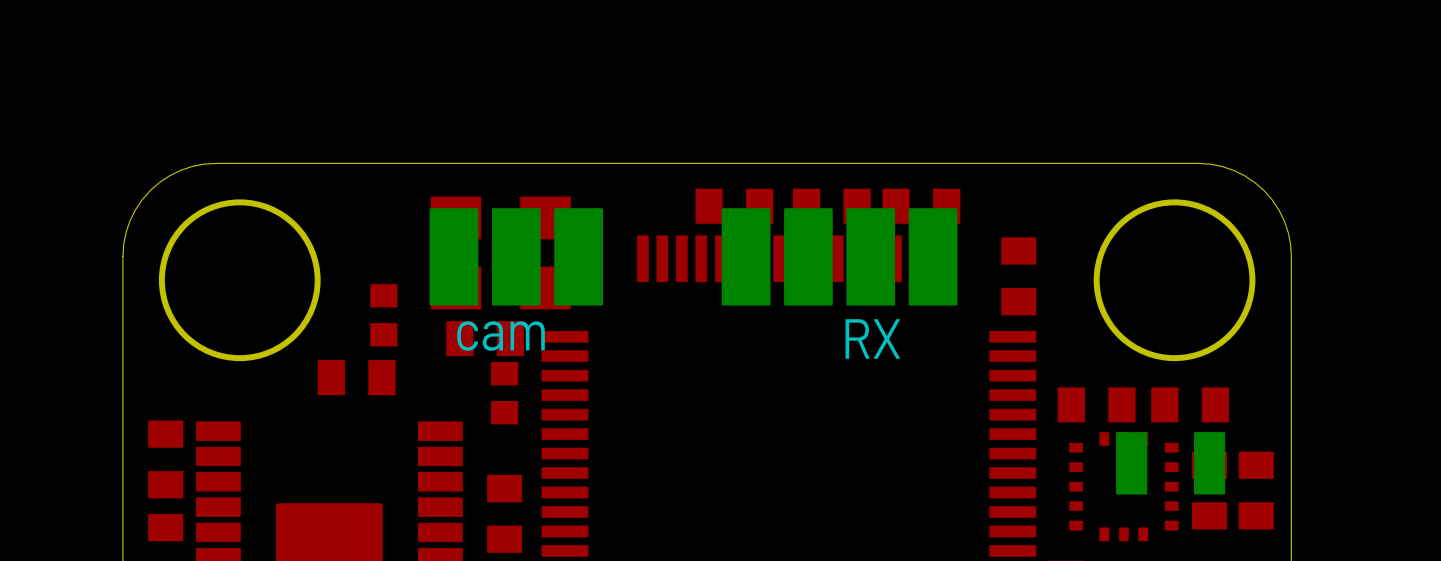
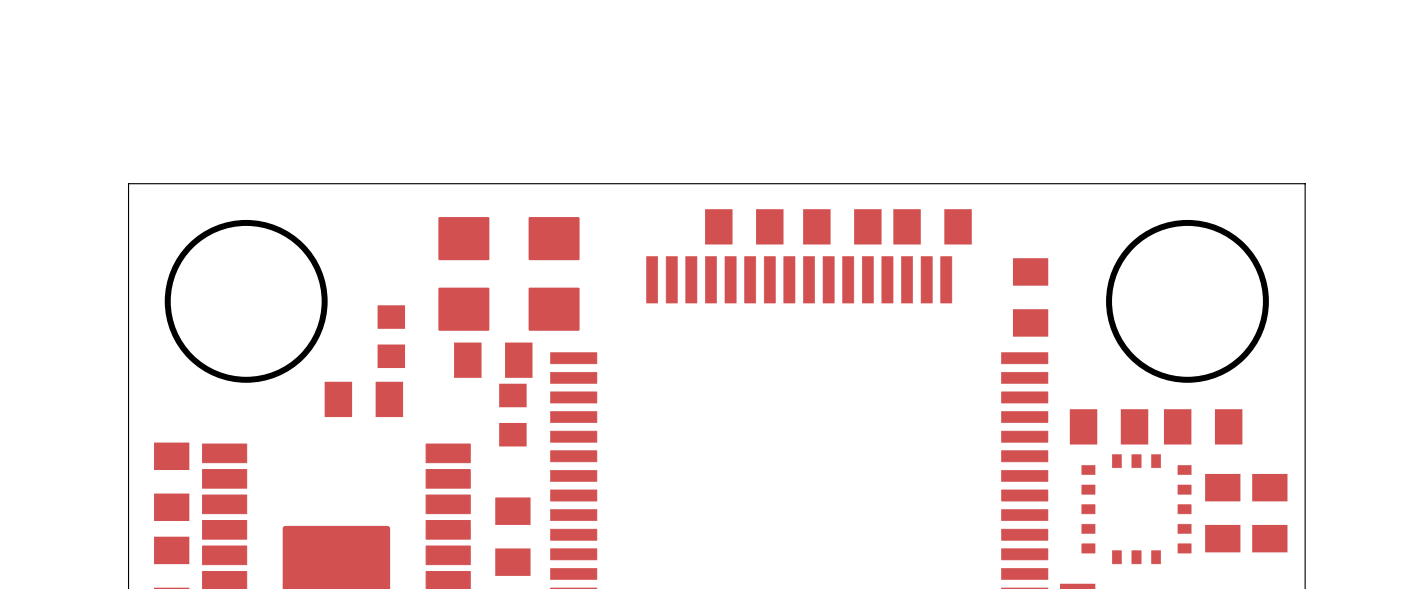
board edge: (216, 163) (203, 164) (180, 170) (159, 182) (150, 190) (142, 199) (130, 220) (123, 244) (122, 256) -> (222, 183) (128, 183) (128, 277)
board edge: (1198, 163) (1210, 164) (1233, 170) (1254, 182) (1264, 190) (1272, 199) (1284, 220) (1290, 244) (1291, 256) -> (1211, 183) (1305, 183) (1305, 277)
part: (453, 256) -> none
part: (516, 256) -> none
part: (578, 256) -> none
part: (746, 256) -> none
part: (808, 256) -> none
part: (870, 256) -> none
part: (933, 256) -> none
text: cam (501, 336) -> none
text: RX (872, 338) -> none
part: (1170, 463) -> none

